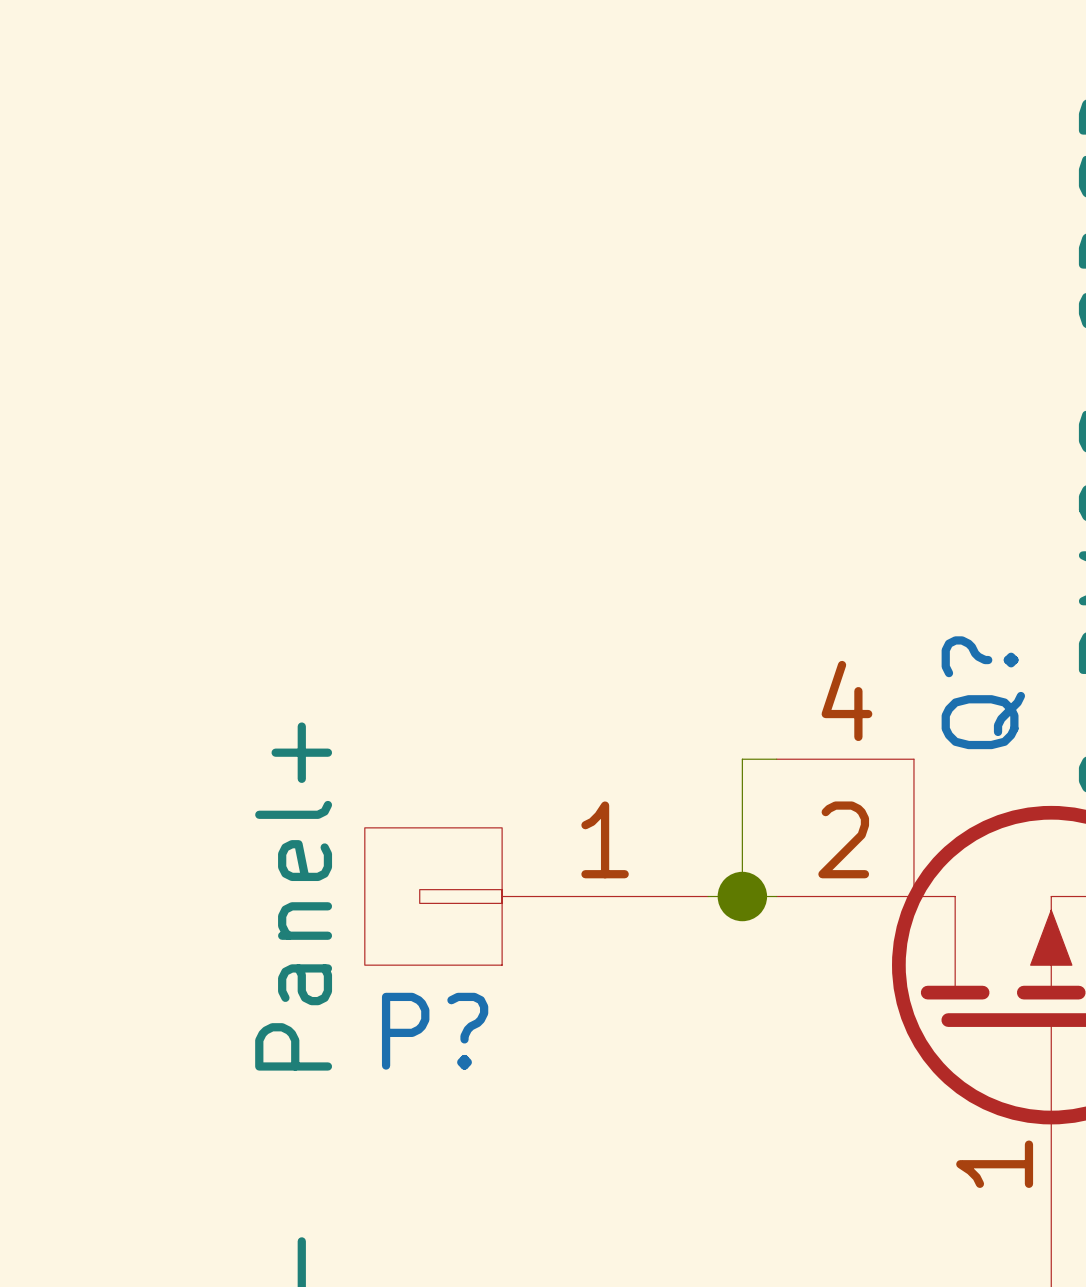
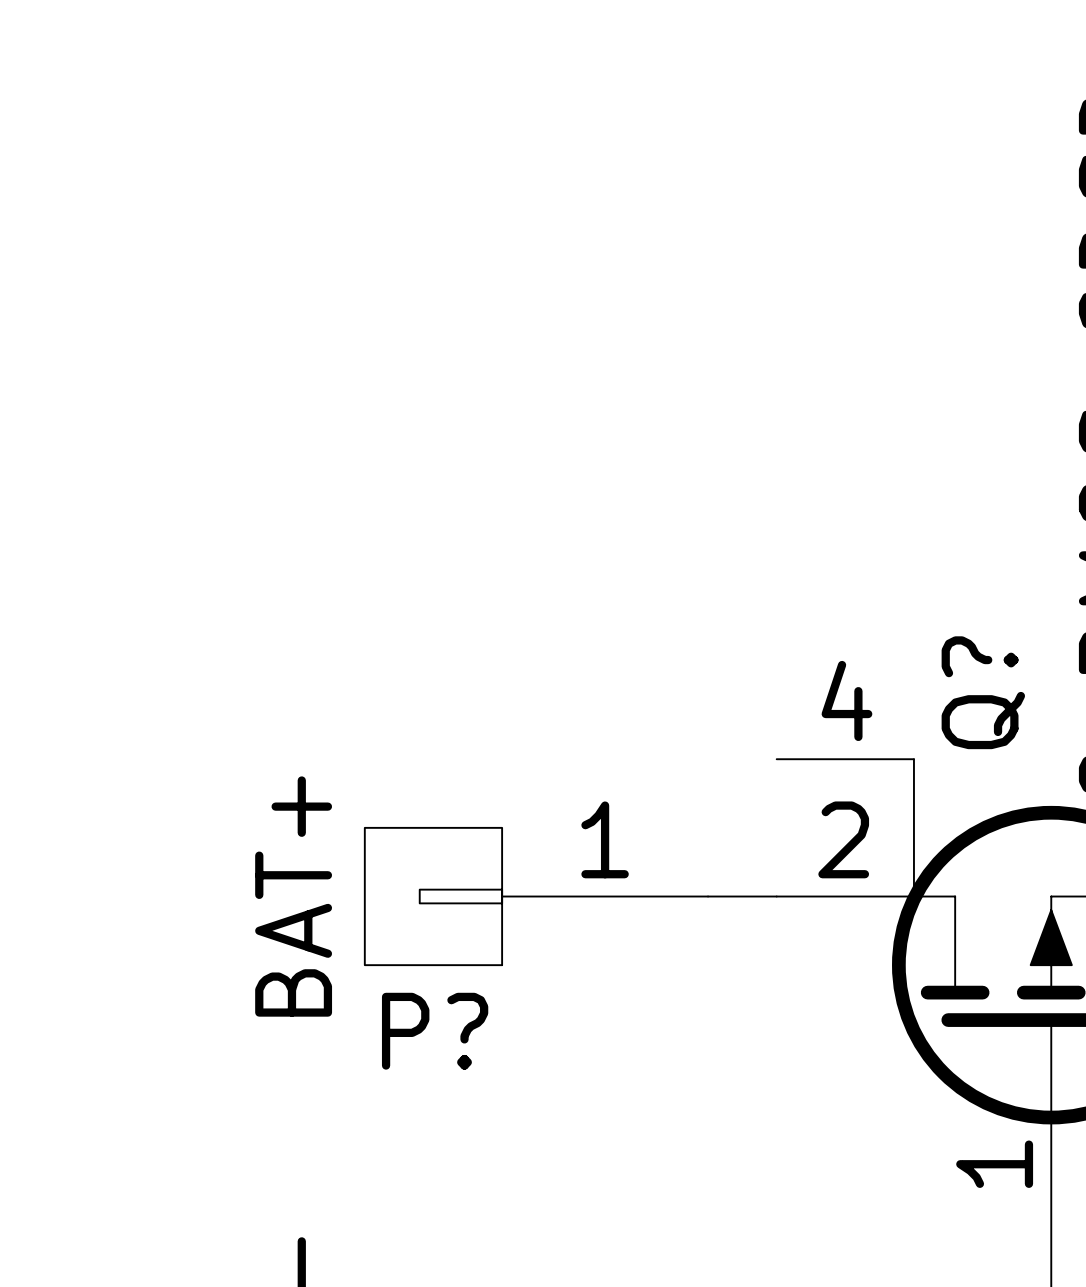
wire: (776, 759) (742, 759) (742, 896) -> none
P? value: Panel+ (293, 896) -> BAT+ (293, 896)
junction: (742, 896) -> none

